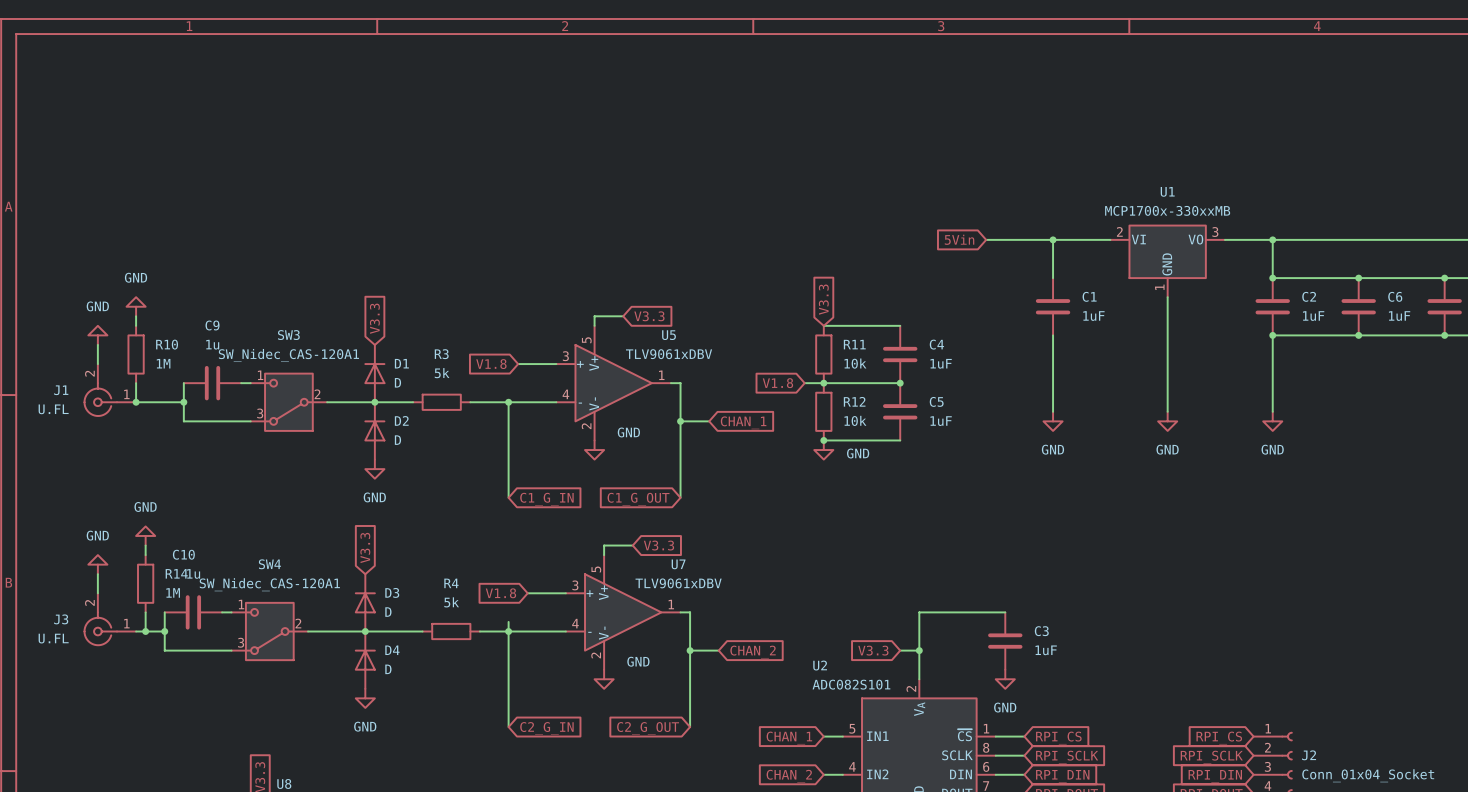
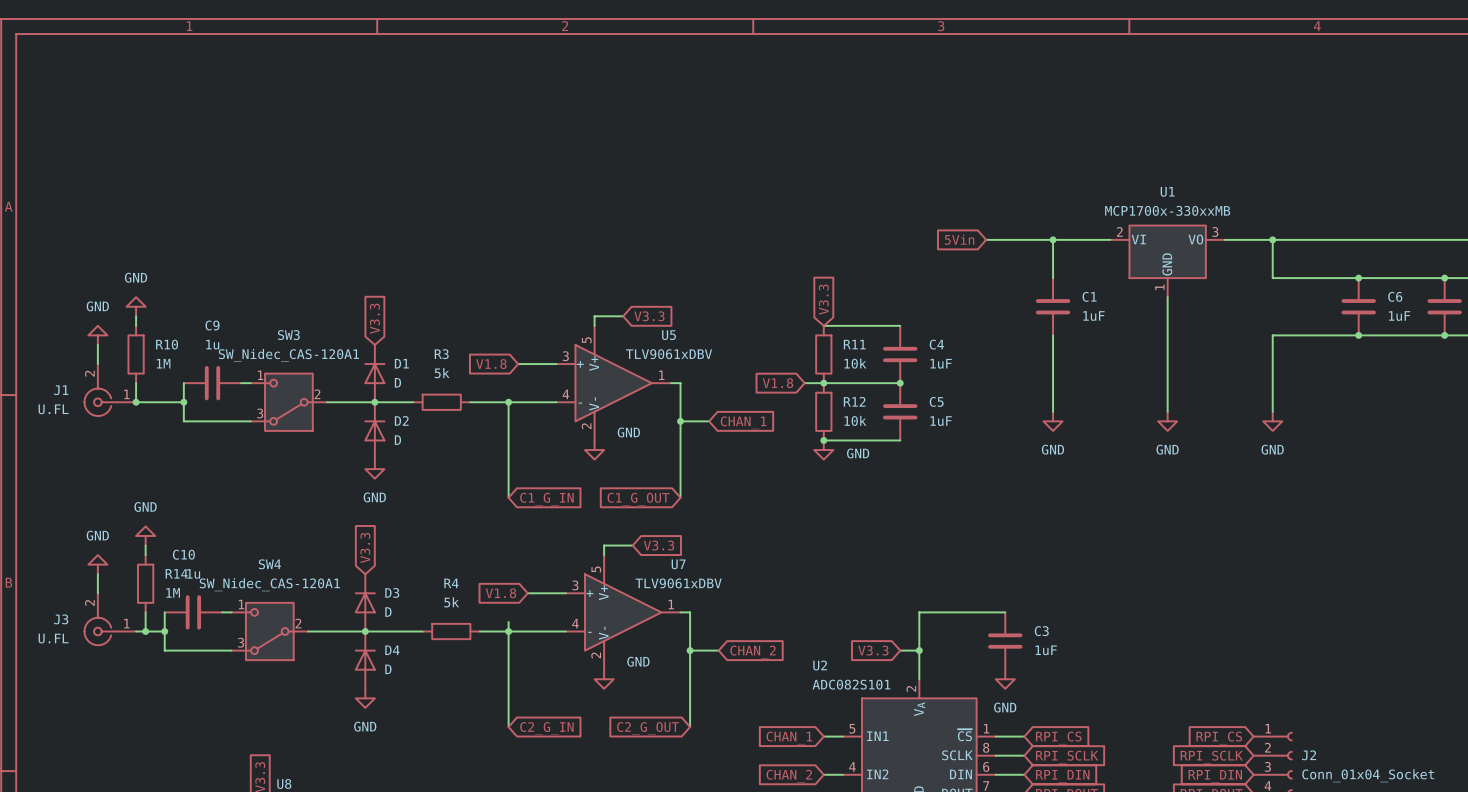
junction: (1272, 278) -> none
C2: 1uF (1272, 306) -> none
junction: (1272, 335) -> none

